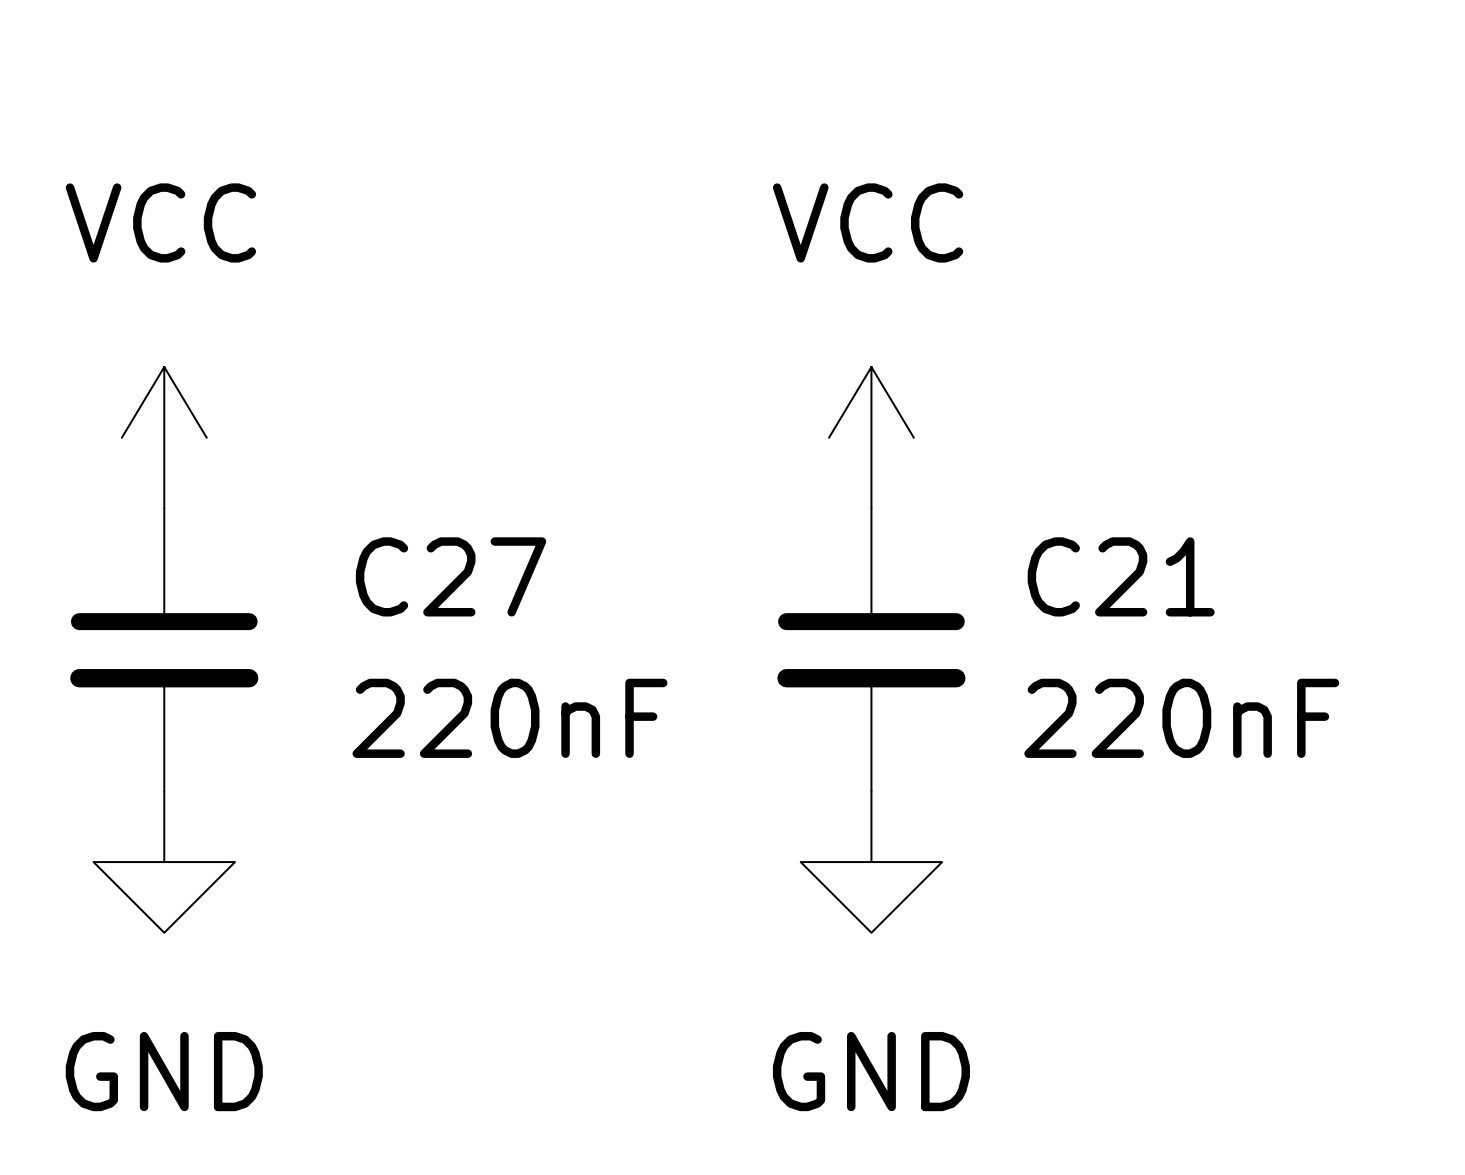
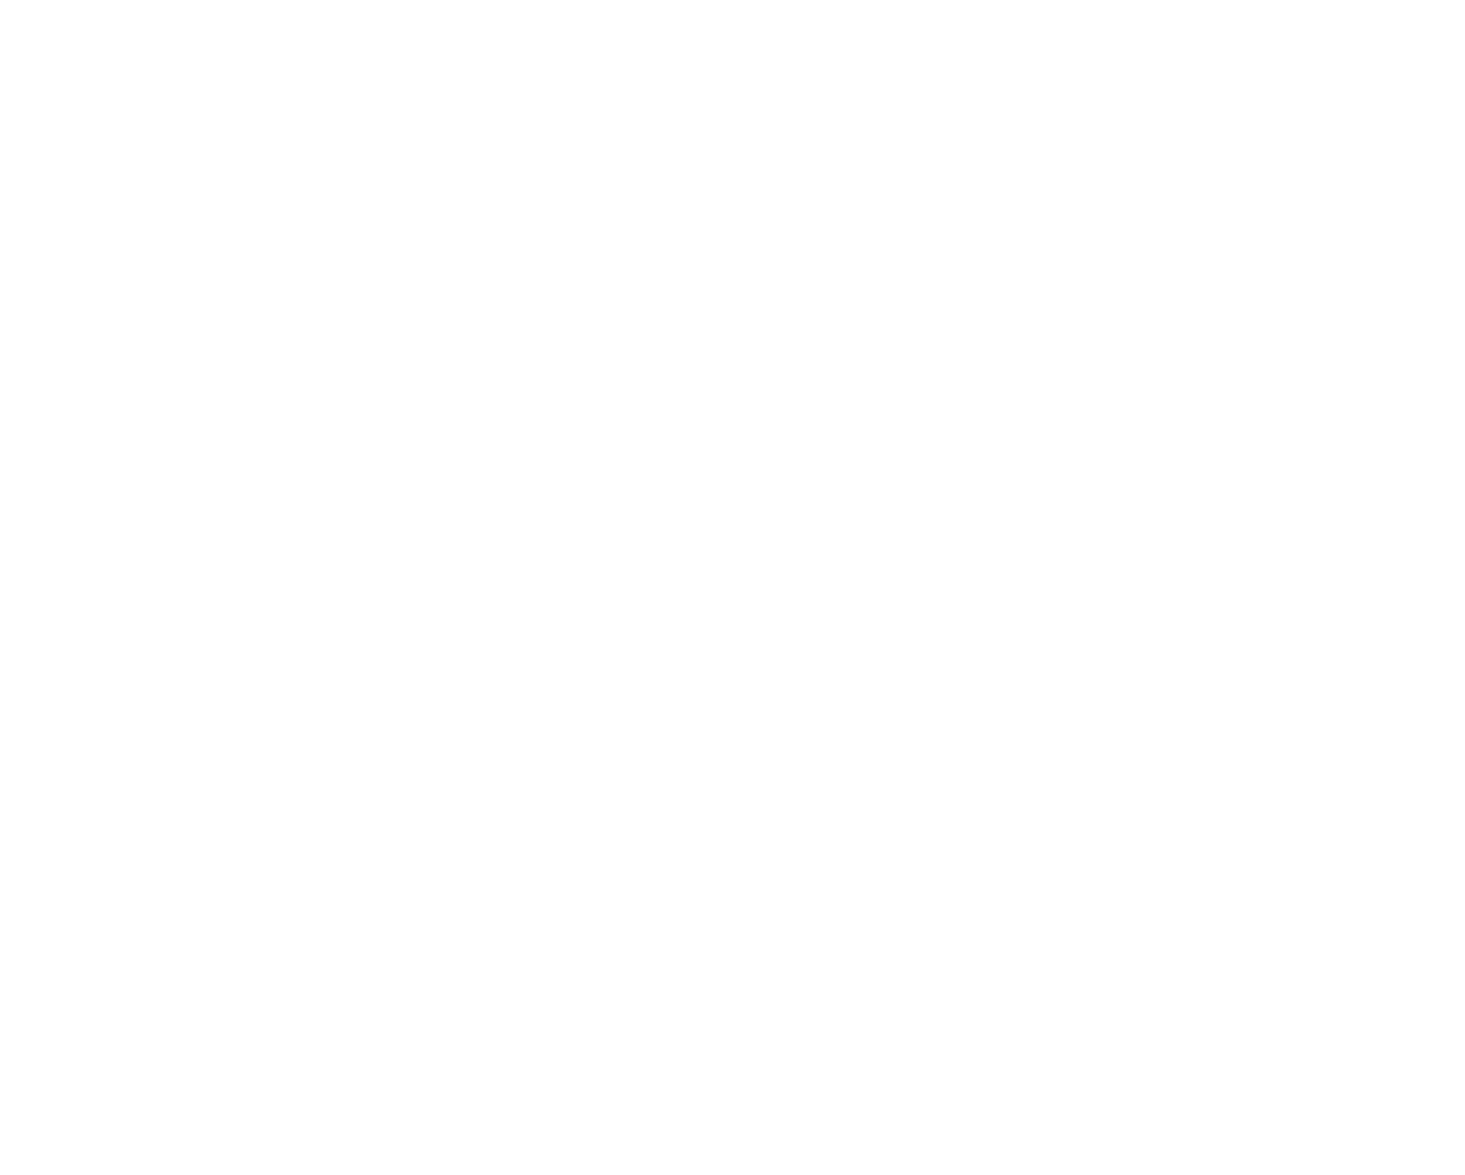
power symbol: VCC (164, 437) -> none
power symbol: VCC (871, 437) -> none
C27: 220nF (164, 649) -> none
C21: 220nF (871, 649) -> none
power symbol: GND (164, 862) -> none
power symbol: GND (871, 862) -> none

